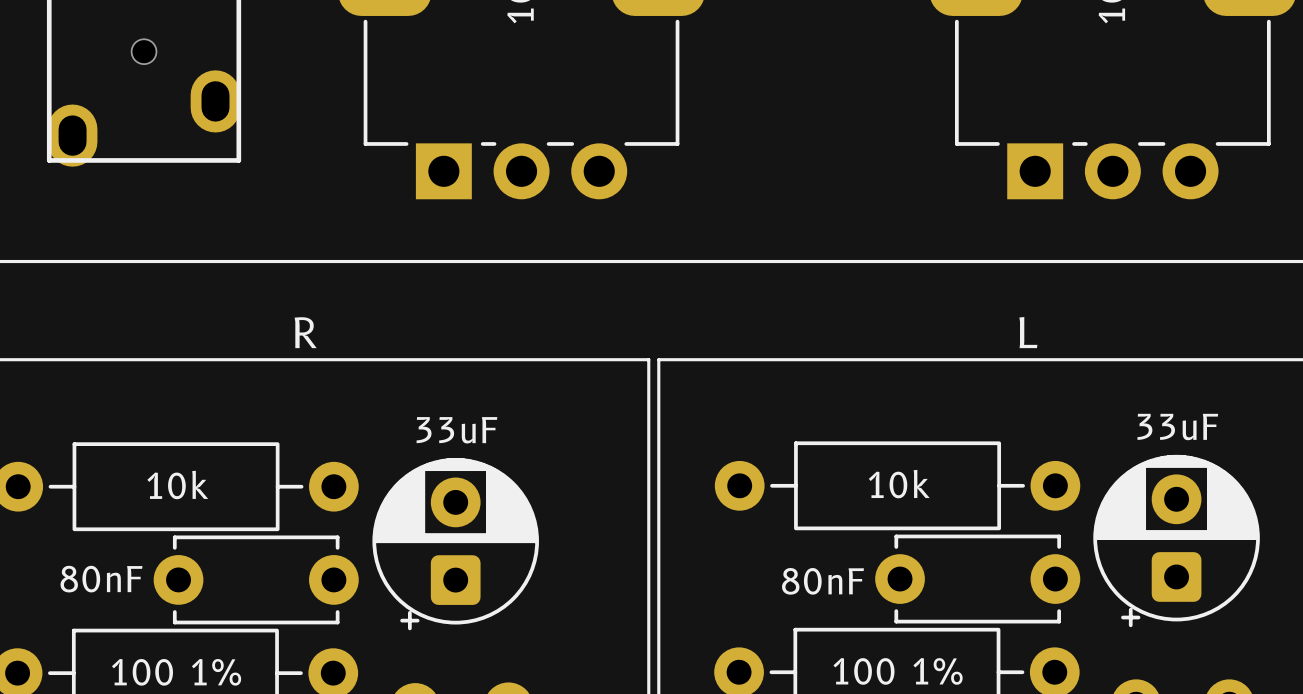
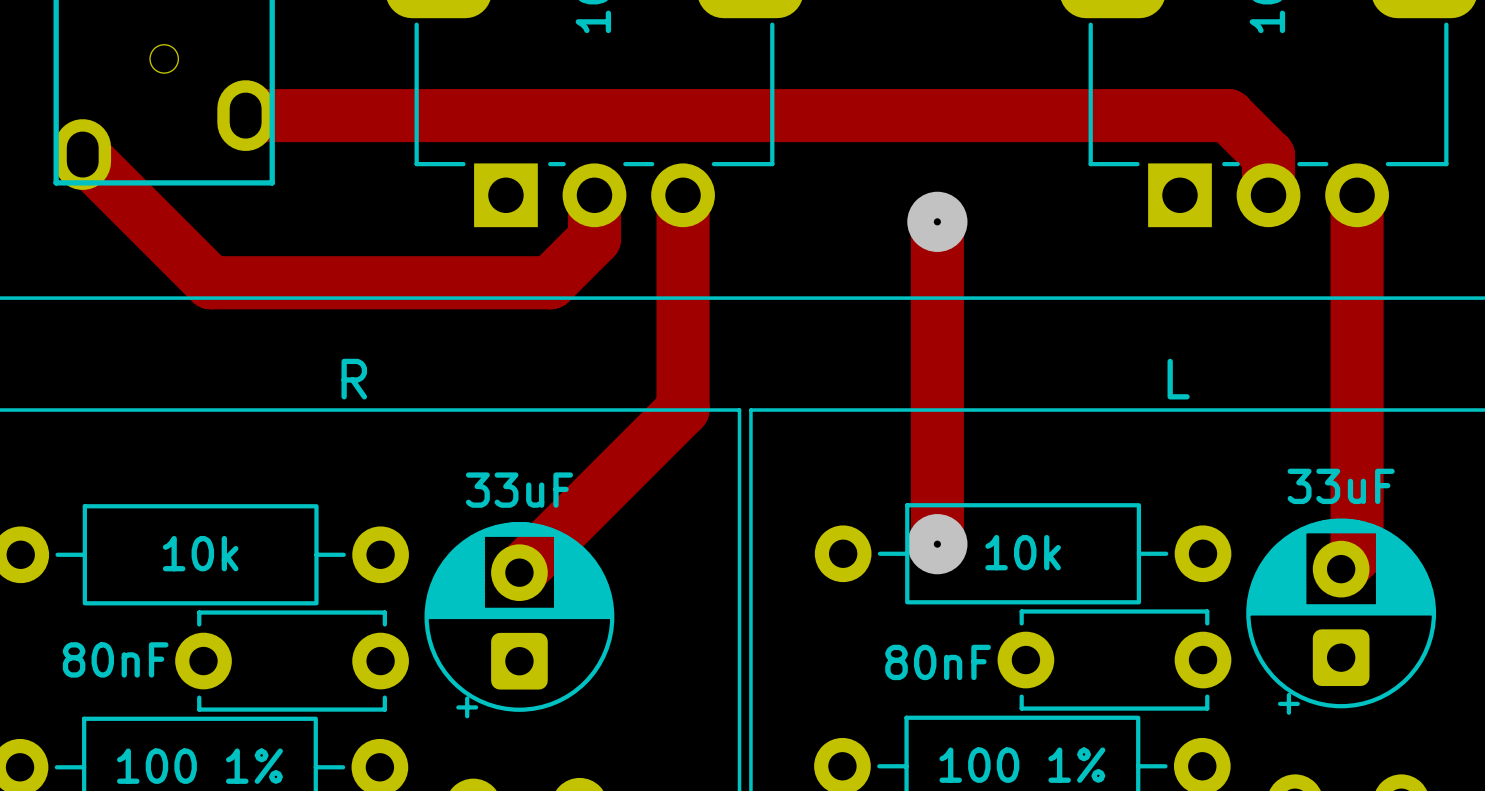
track: none -> (245, 117) (245, 115) (1228, 115) (1268, 156) (1268, 195)
track: none -> (82, 156) (210, 282) (550, 282) (594, 238) (594, 195)
track: none -> (683, 195) (683, 409) (519, 572)
track: none -> (1357, 195) (1357, 553) (1341, 569)
track: none -> (937, 221) (937, 544)
via: none -> (937, 221)
via: none -> (937, 544)

